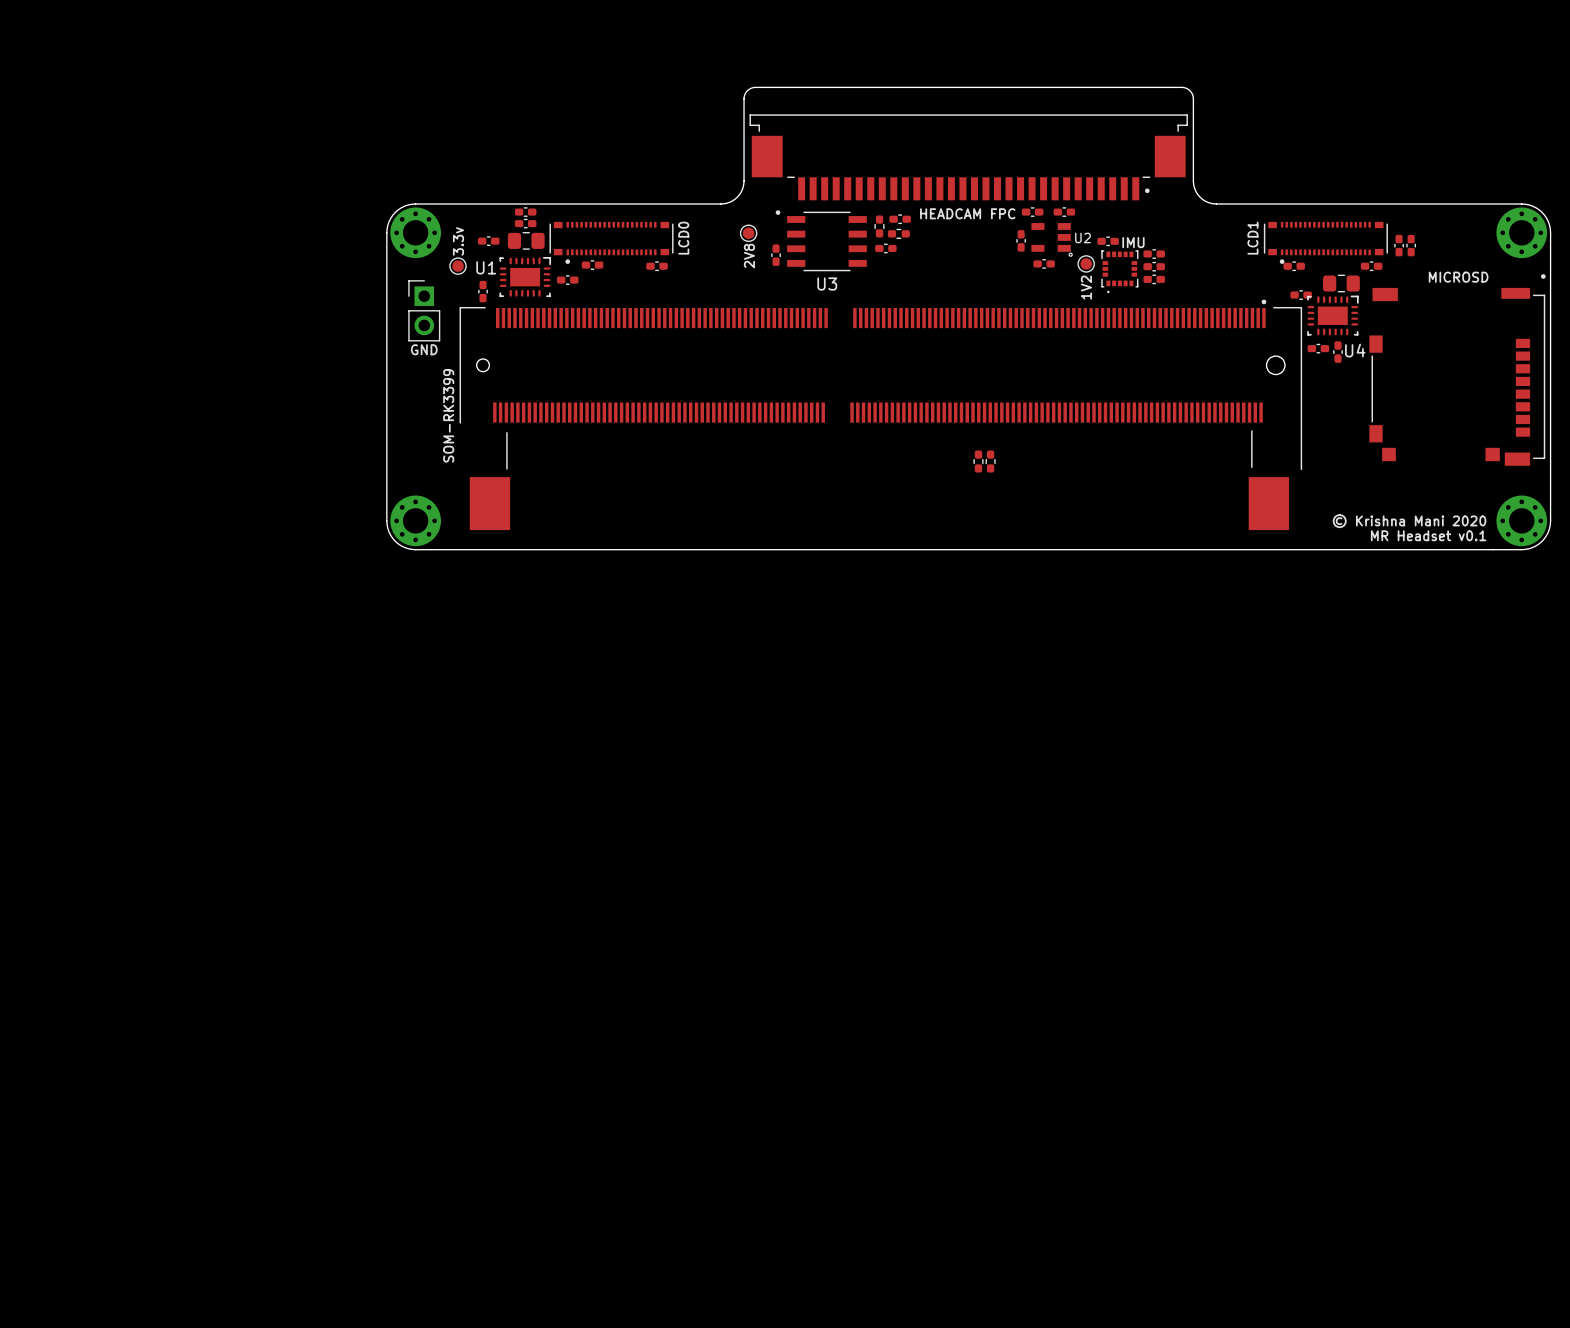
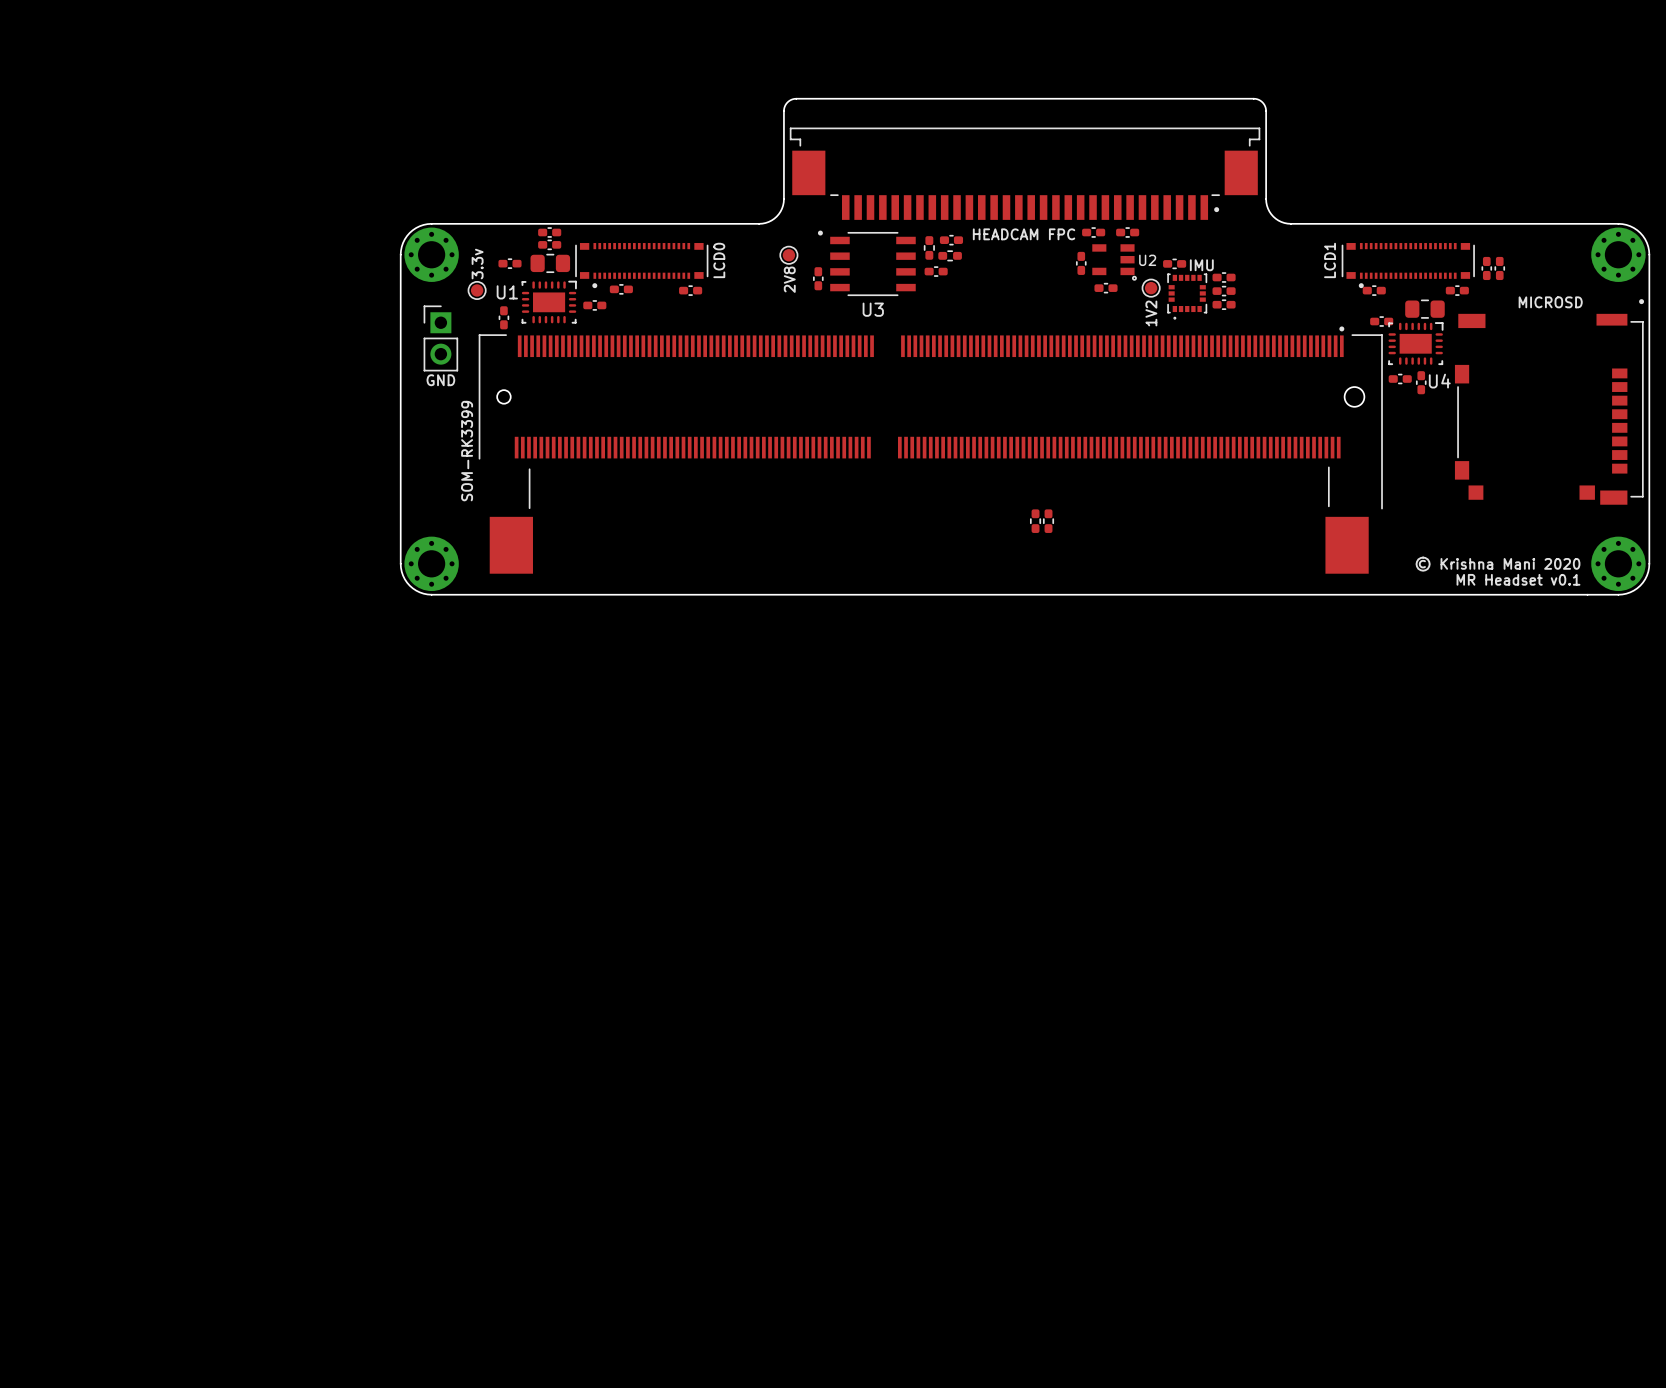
part: (978, 461) -> none
part: (990, 461) -> none
part: none -> (1035, 521)
part: none -> (1048, 521)

